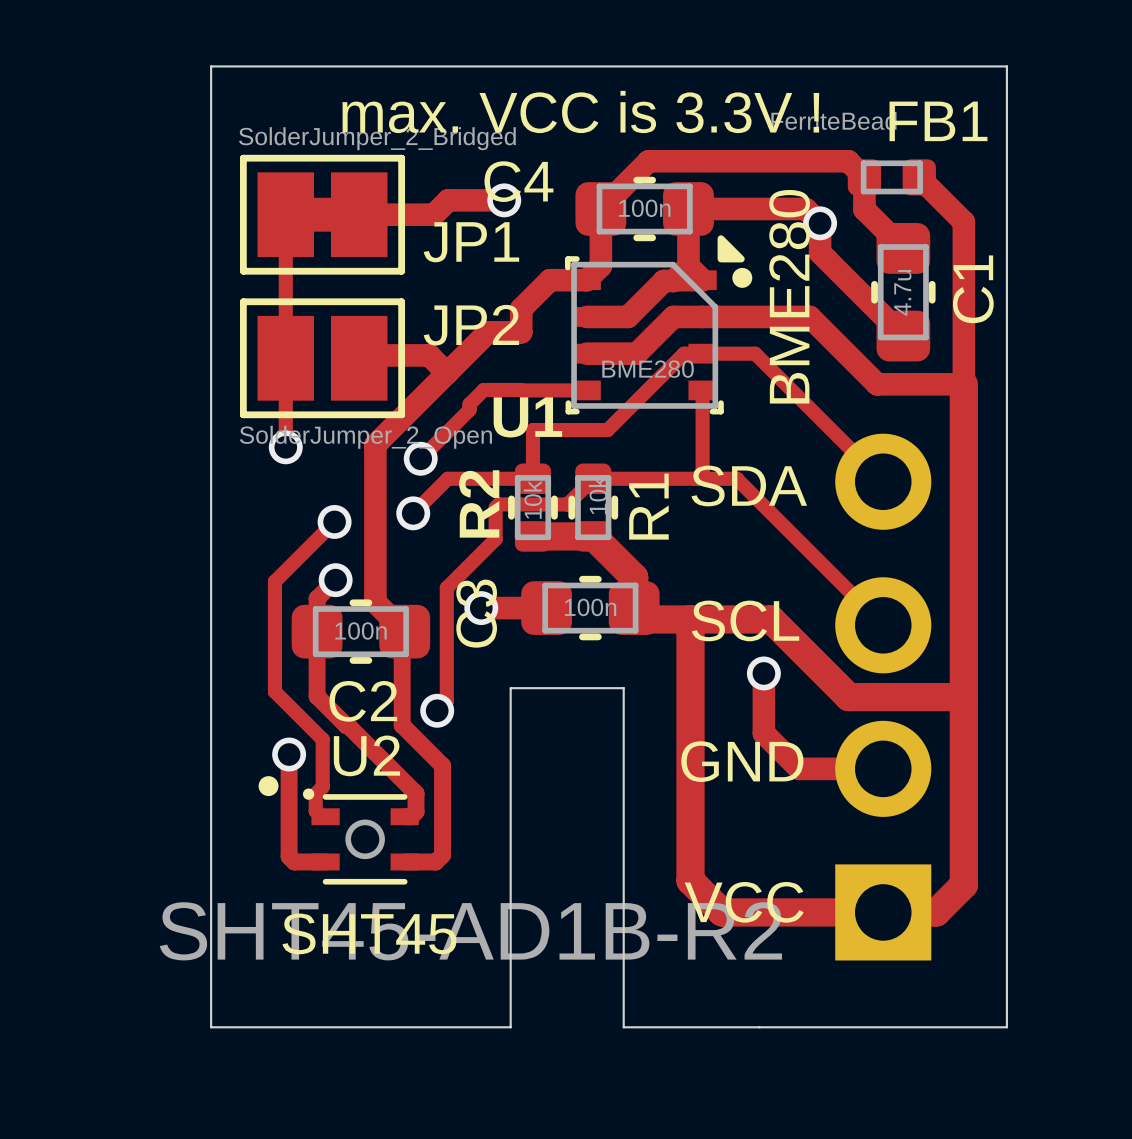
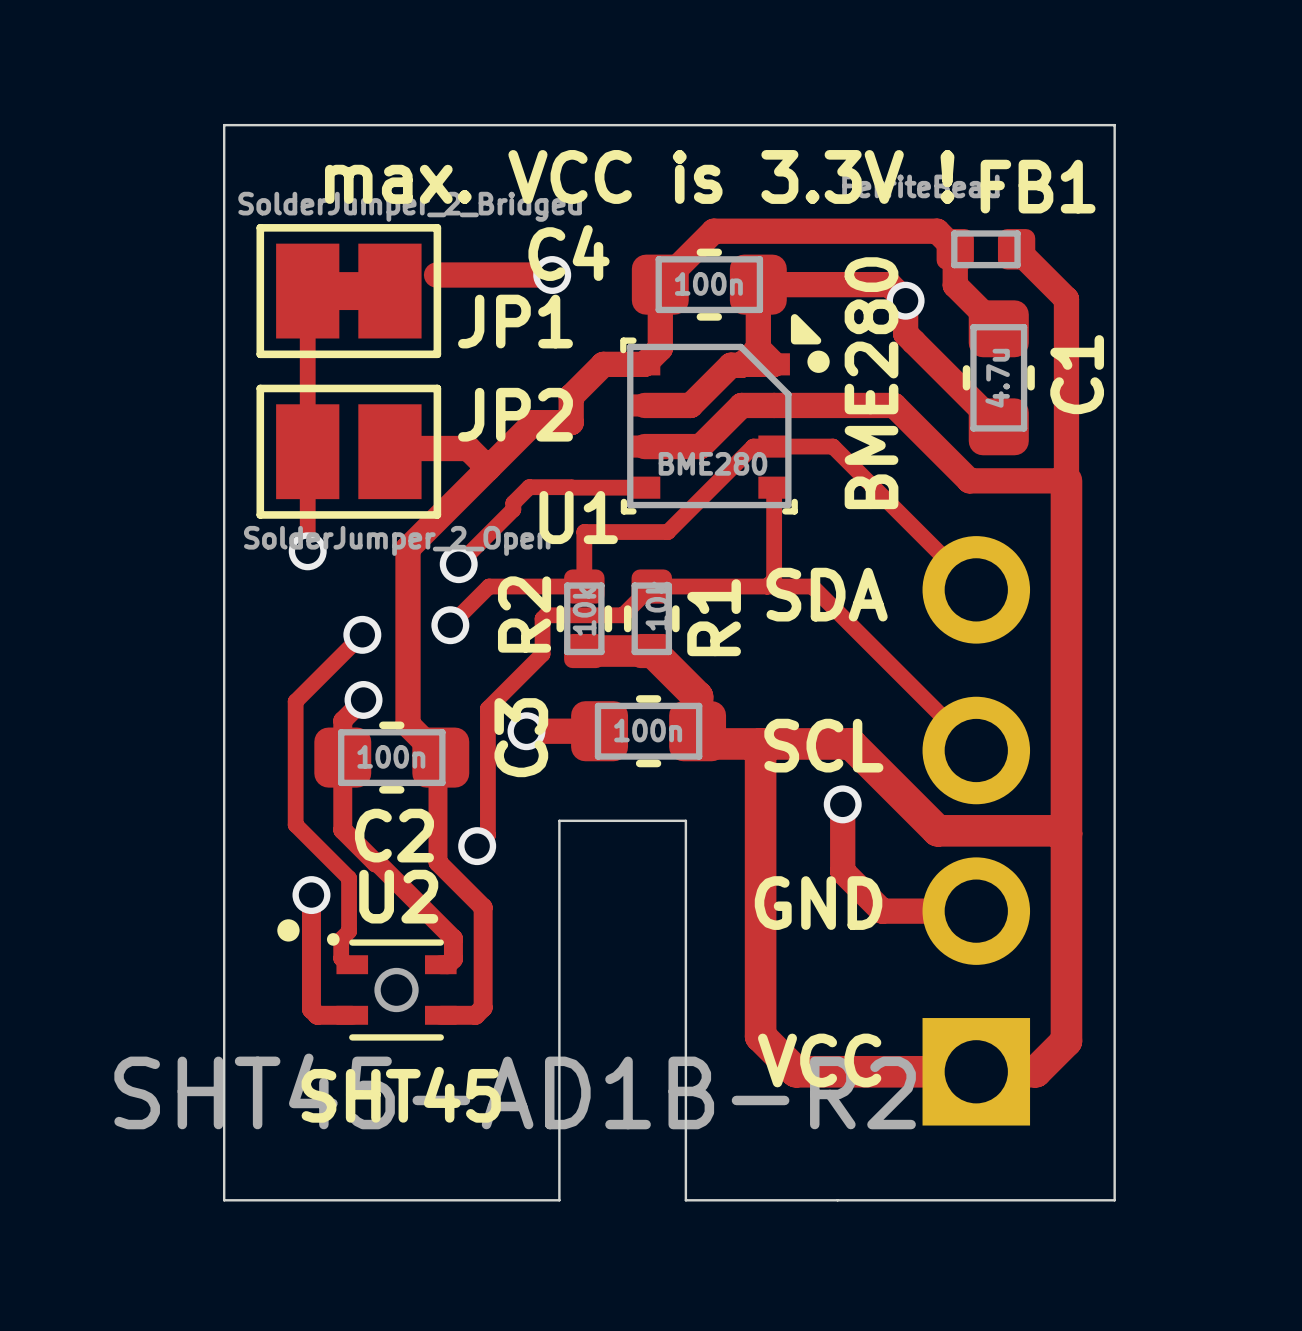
track: (448, 200) (433, 214) (359, 214) -> (489, 275) (436, 275)

